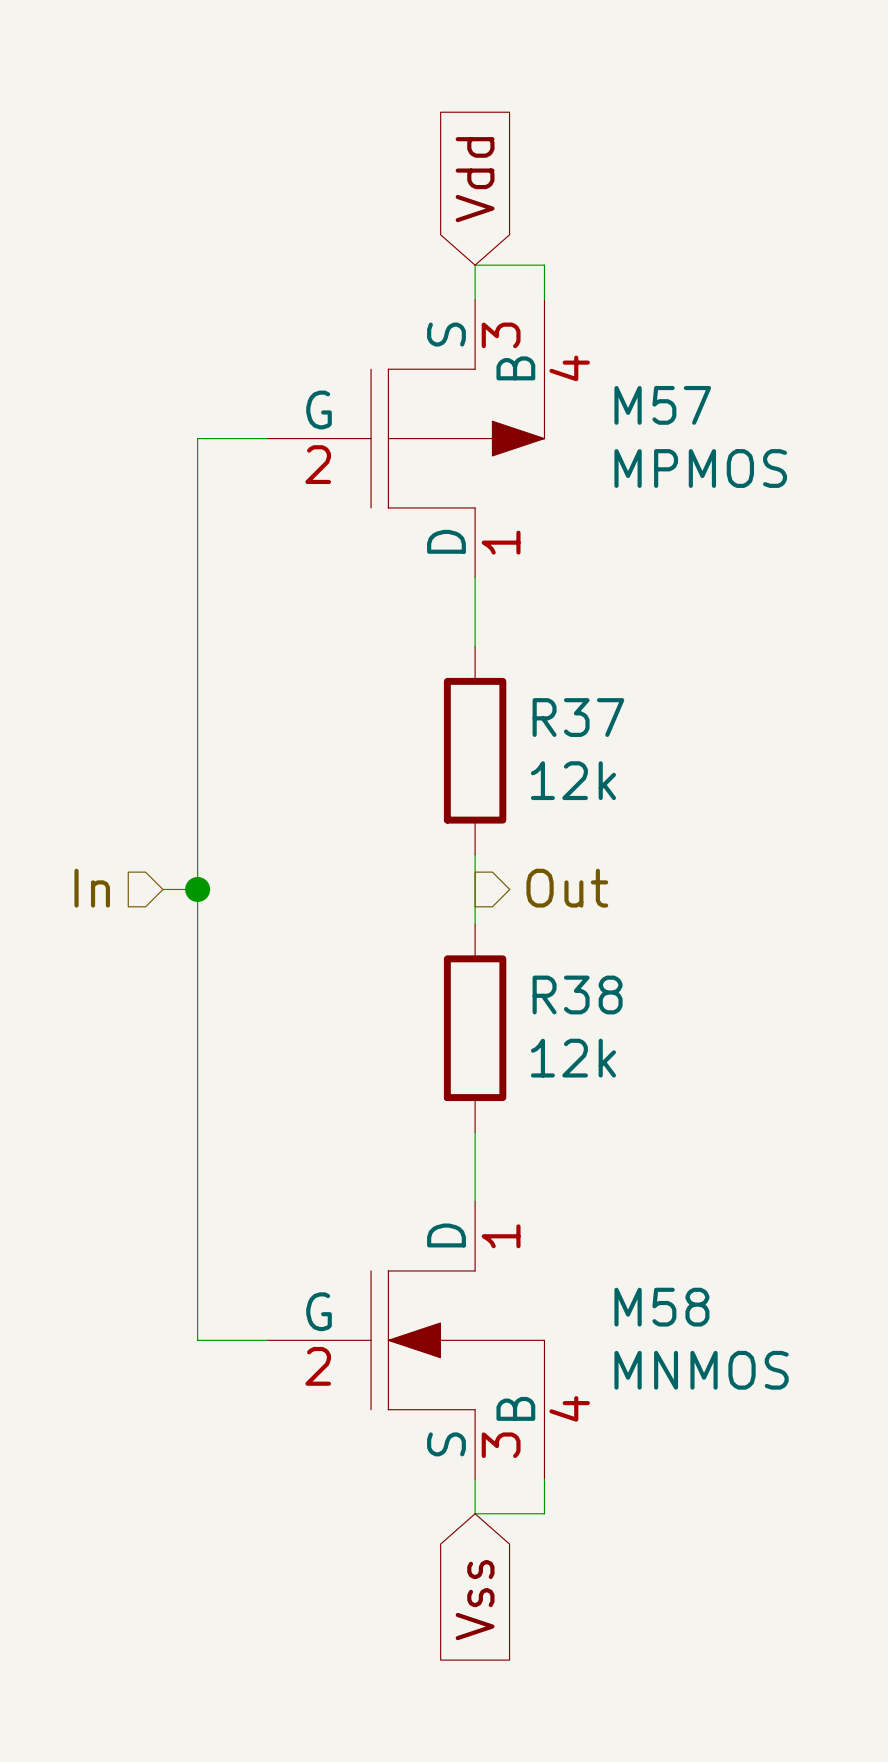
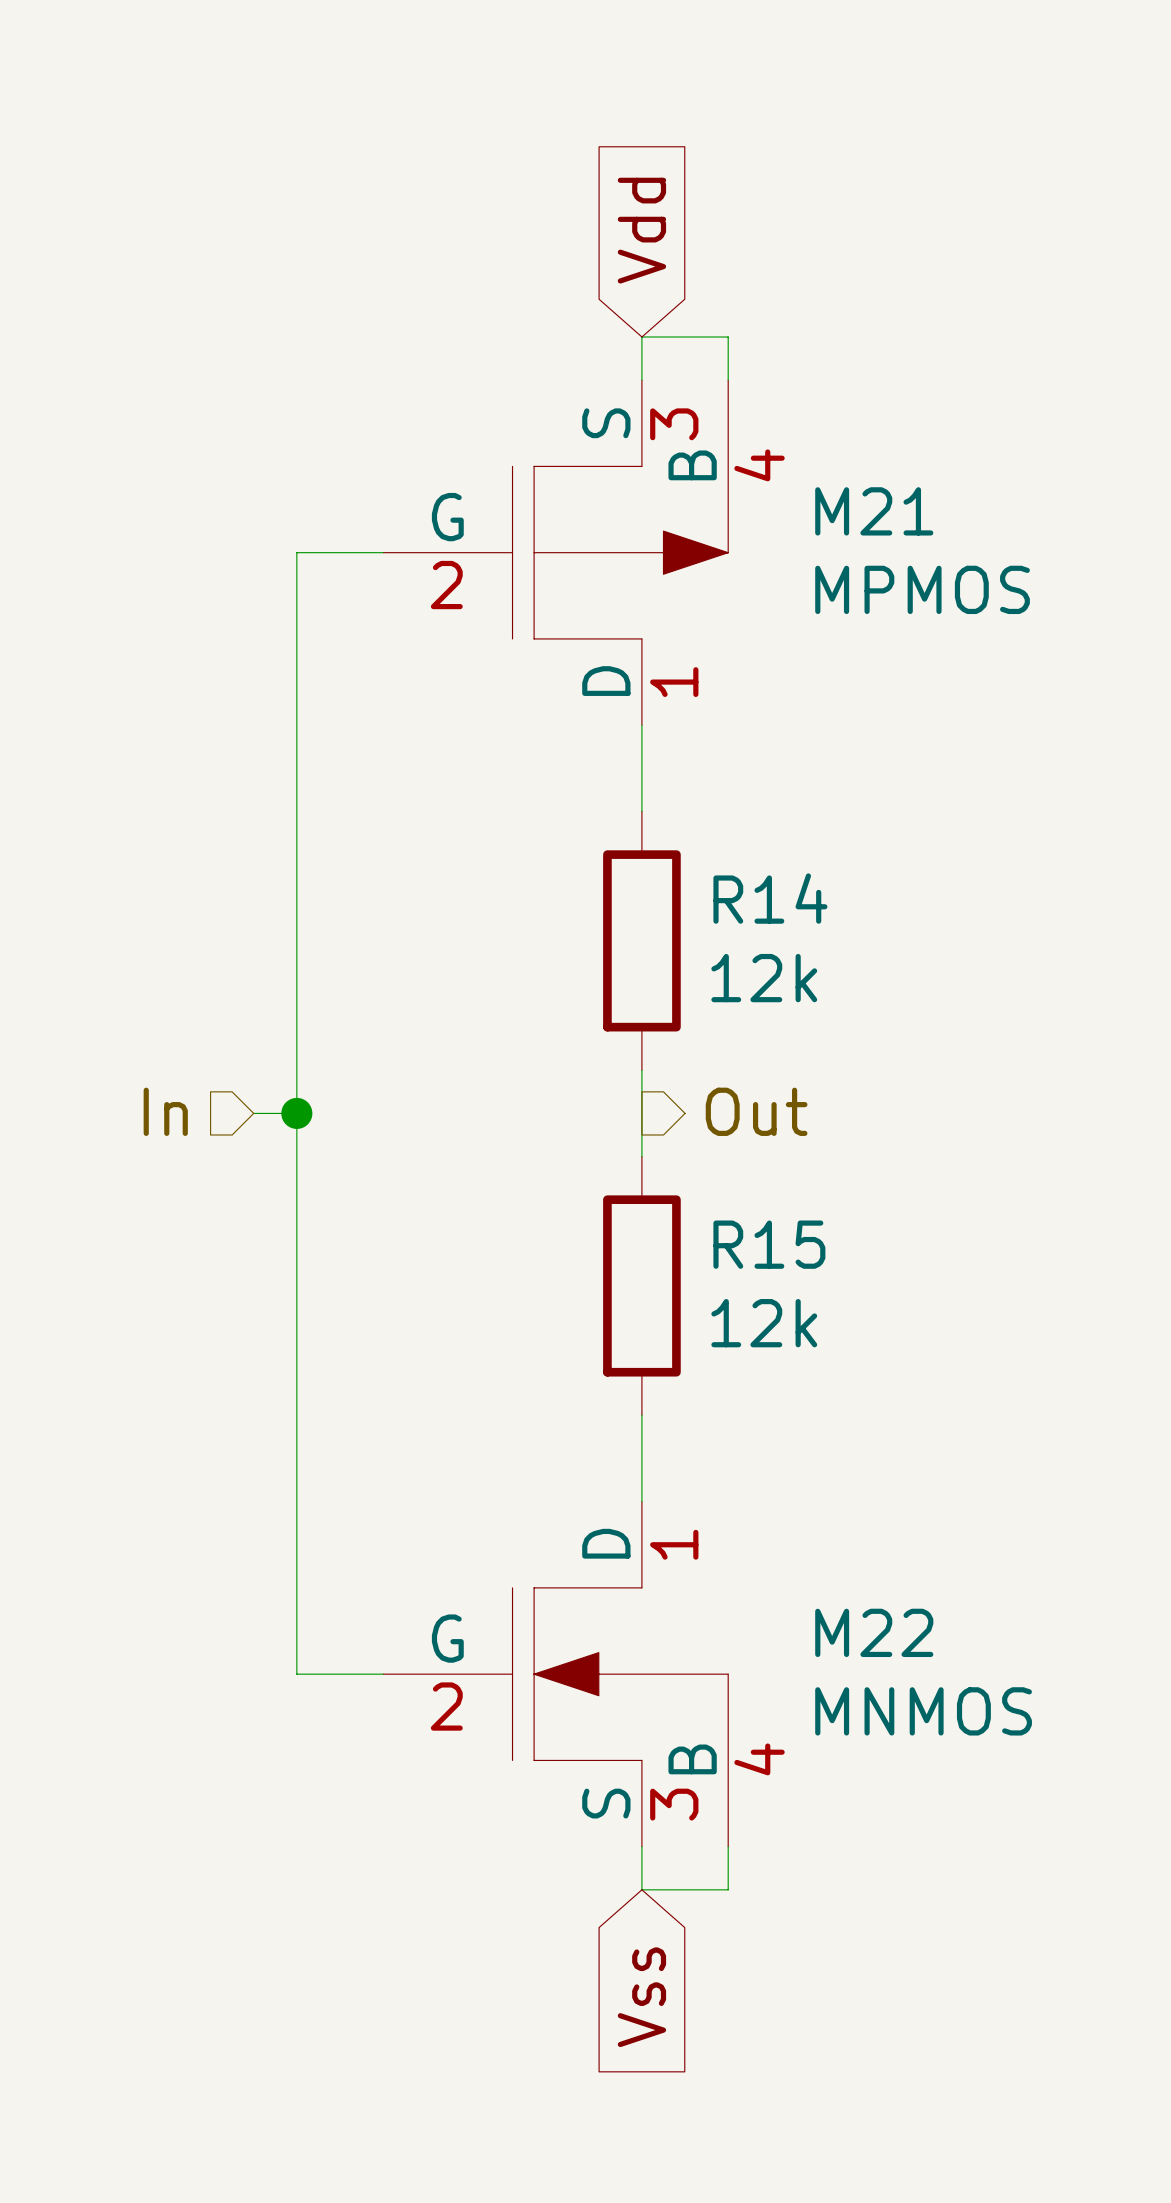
M57 name: M57 (662, 405) -> M21 (874, 511)
R37 name: R37 (578, 717) -> R14 (770, 898)
R38 name: R38 (577, 994) -> R15 (769, 1244)
M58 name: M58 (661, 1307) -> M22 (874, 1632)

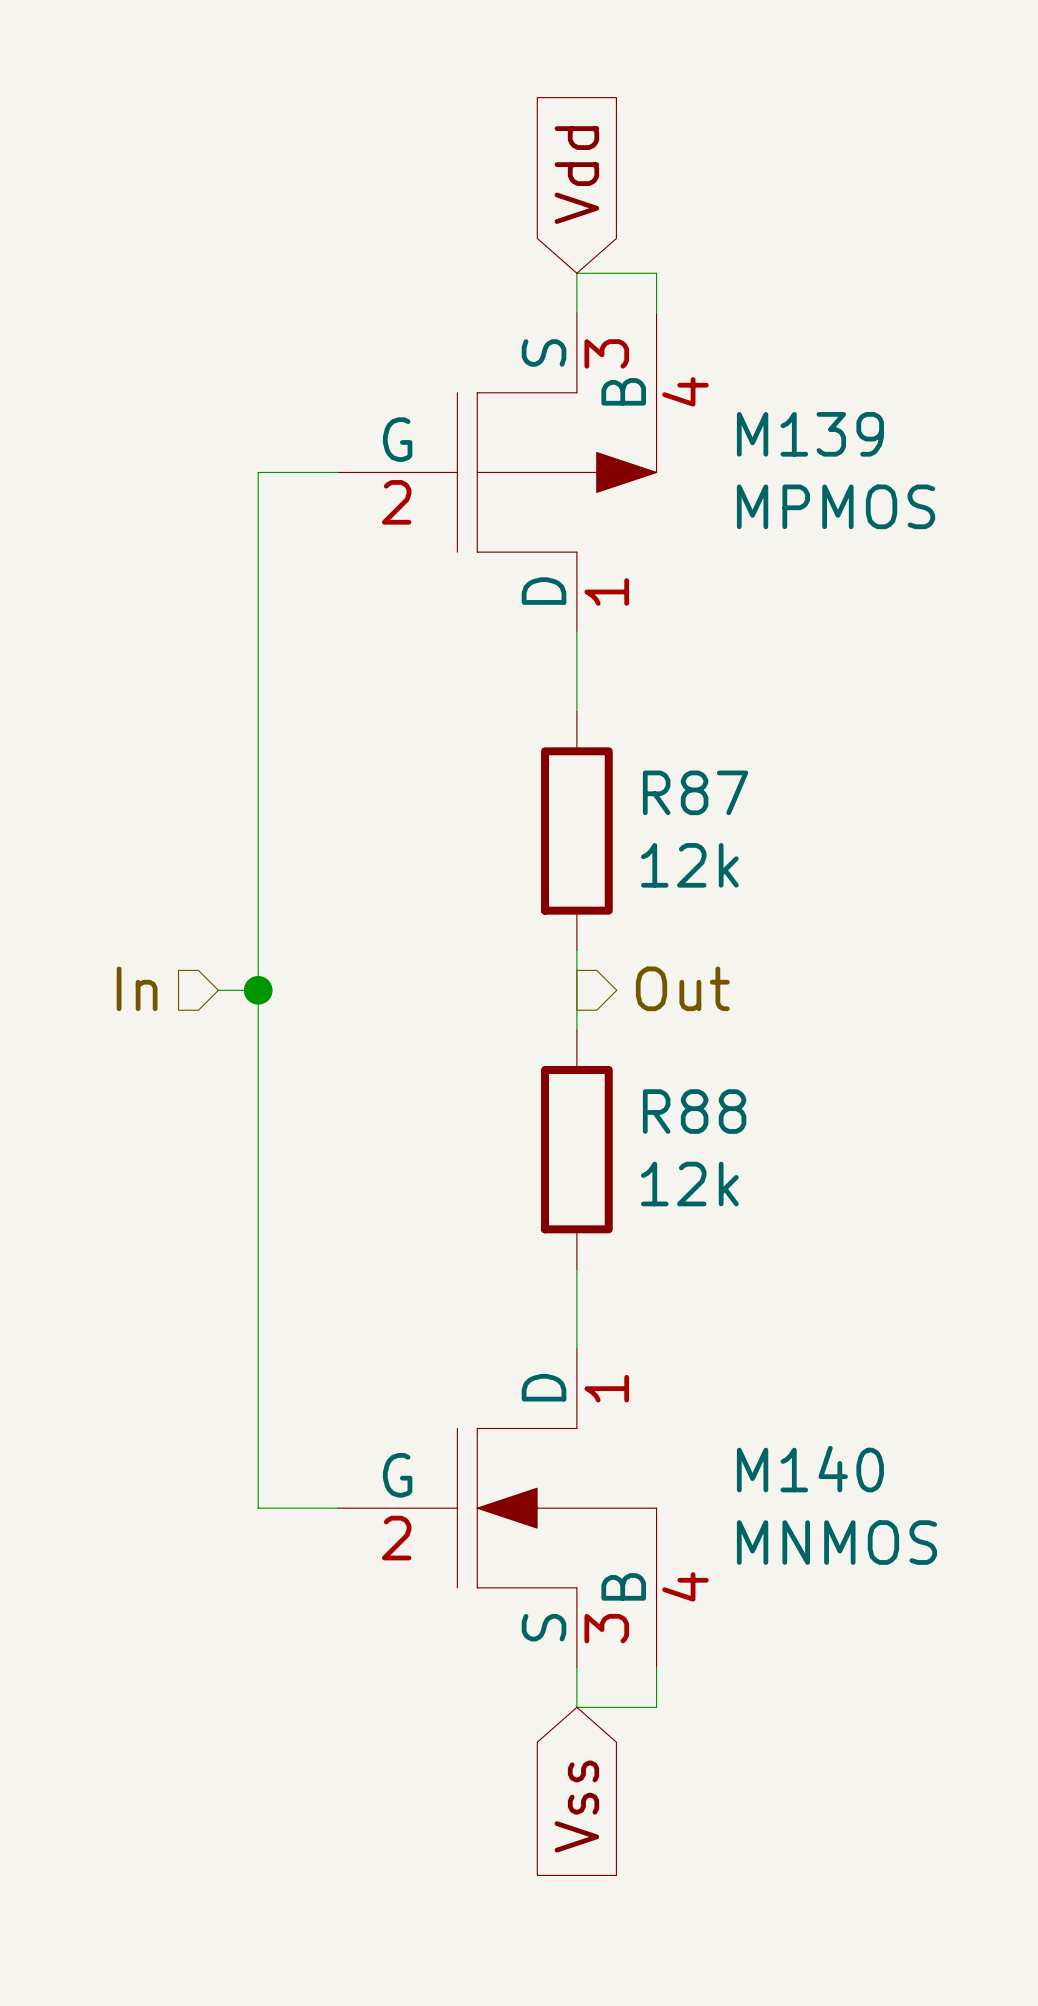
M21 name: M21 (874, 511) -> M139 (810, 434)
R14 name: R14 (770, 898) -> R87 (695, 792)
R15 name: R15 (769, 1244) -> R88 (694, 1111)
M22 name: M22 (874, 1632) -> M140 (810, 1469)

